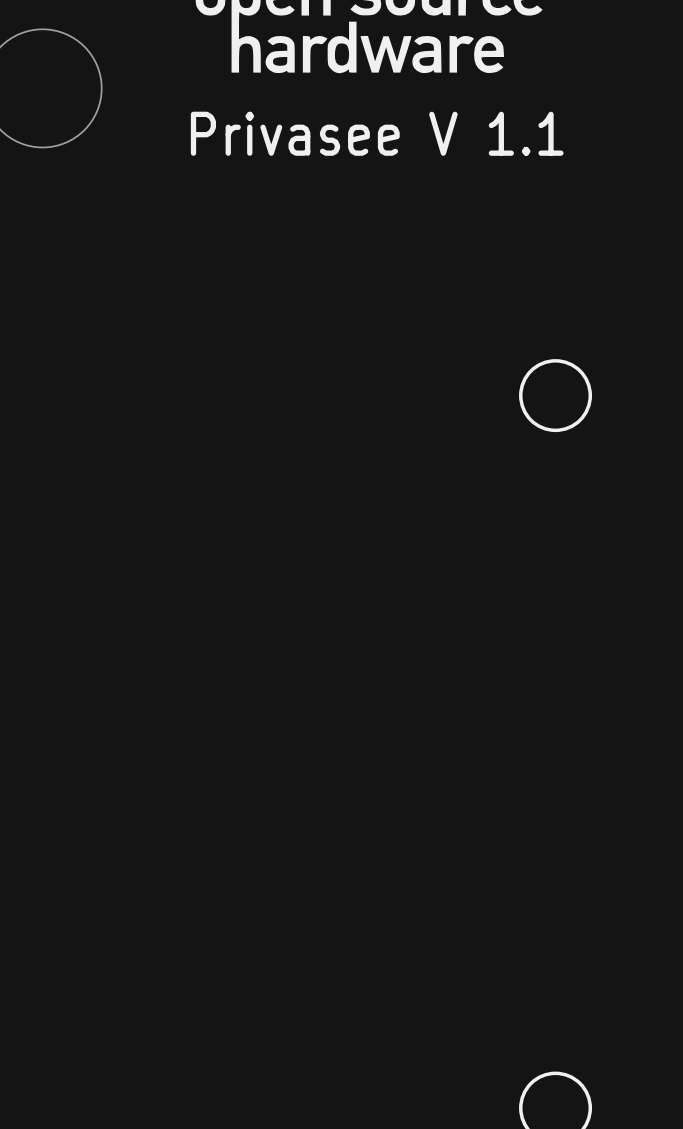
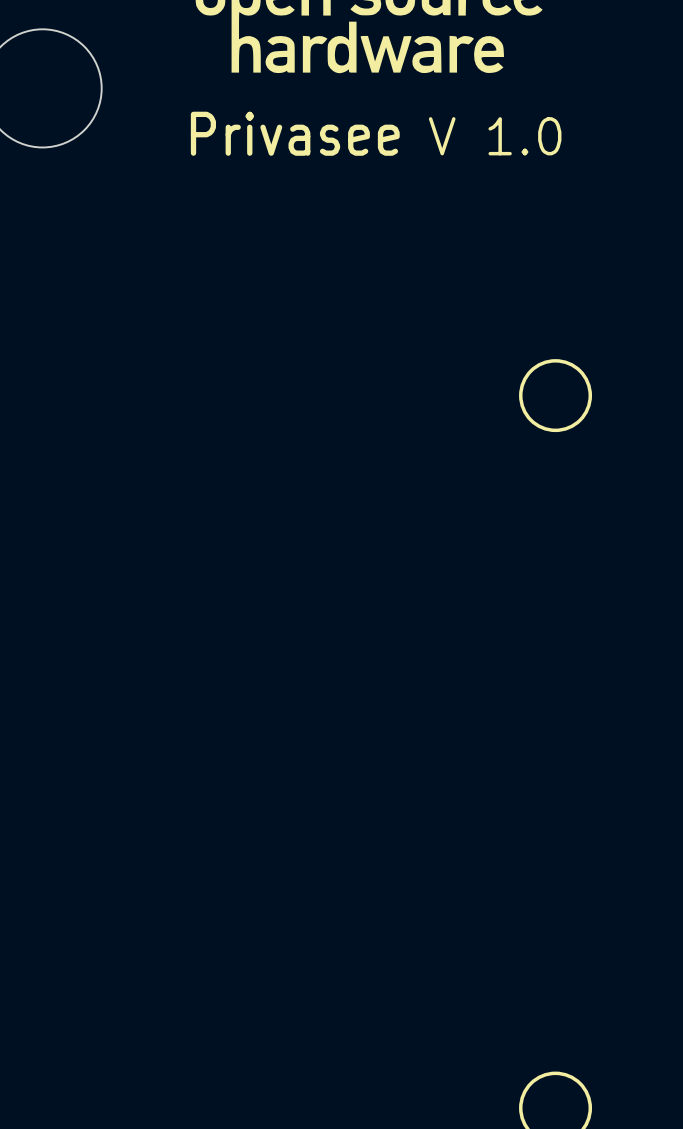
text: V 1.1 (496, 133) -> V 1.0 (495, 136)

